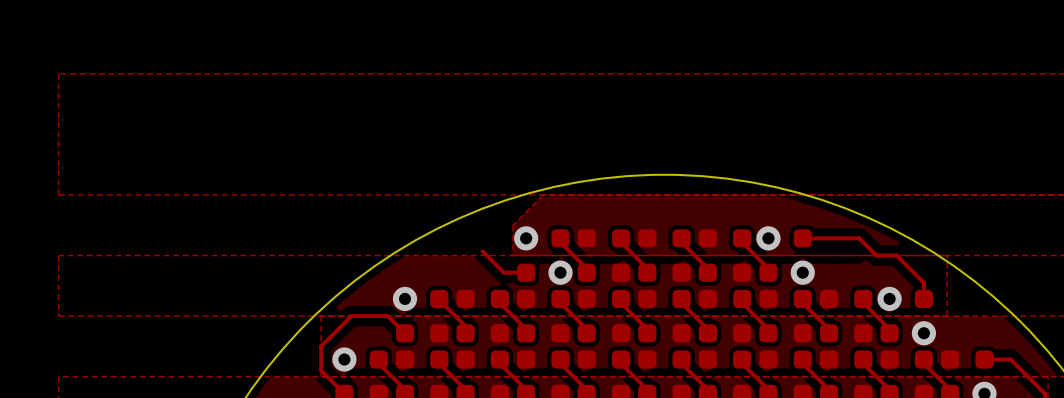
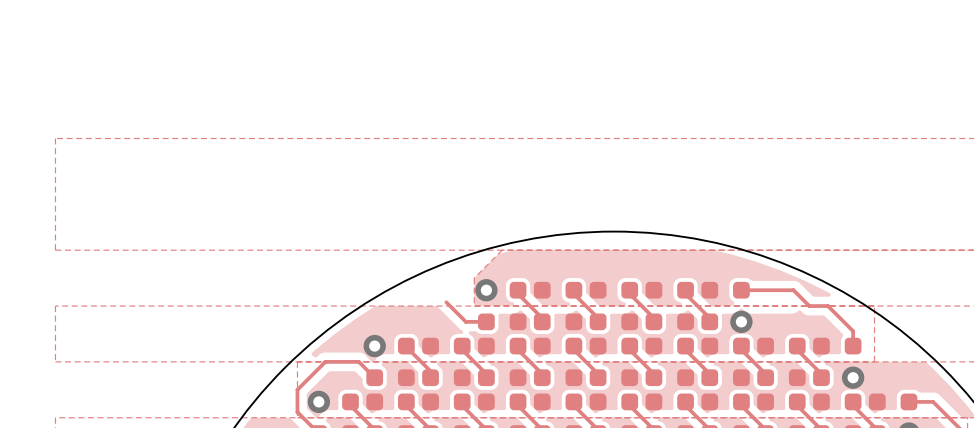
via: (768, 238) -> none
via: (560, 272) -> none
via: (889, 298) -> none

